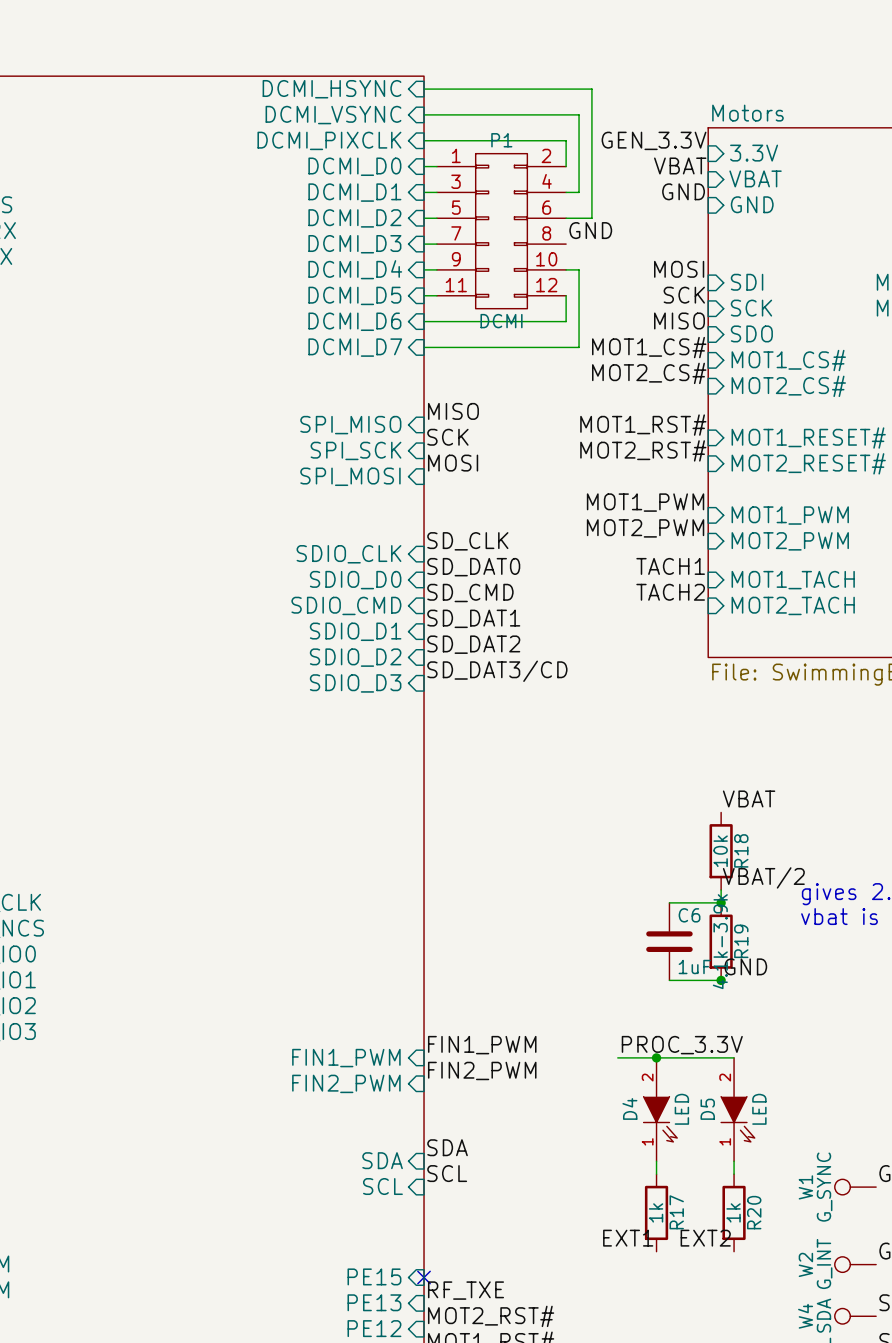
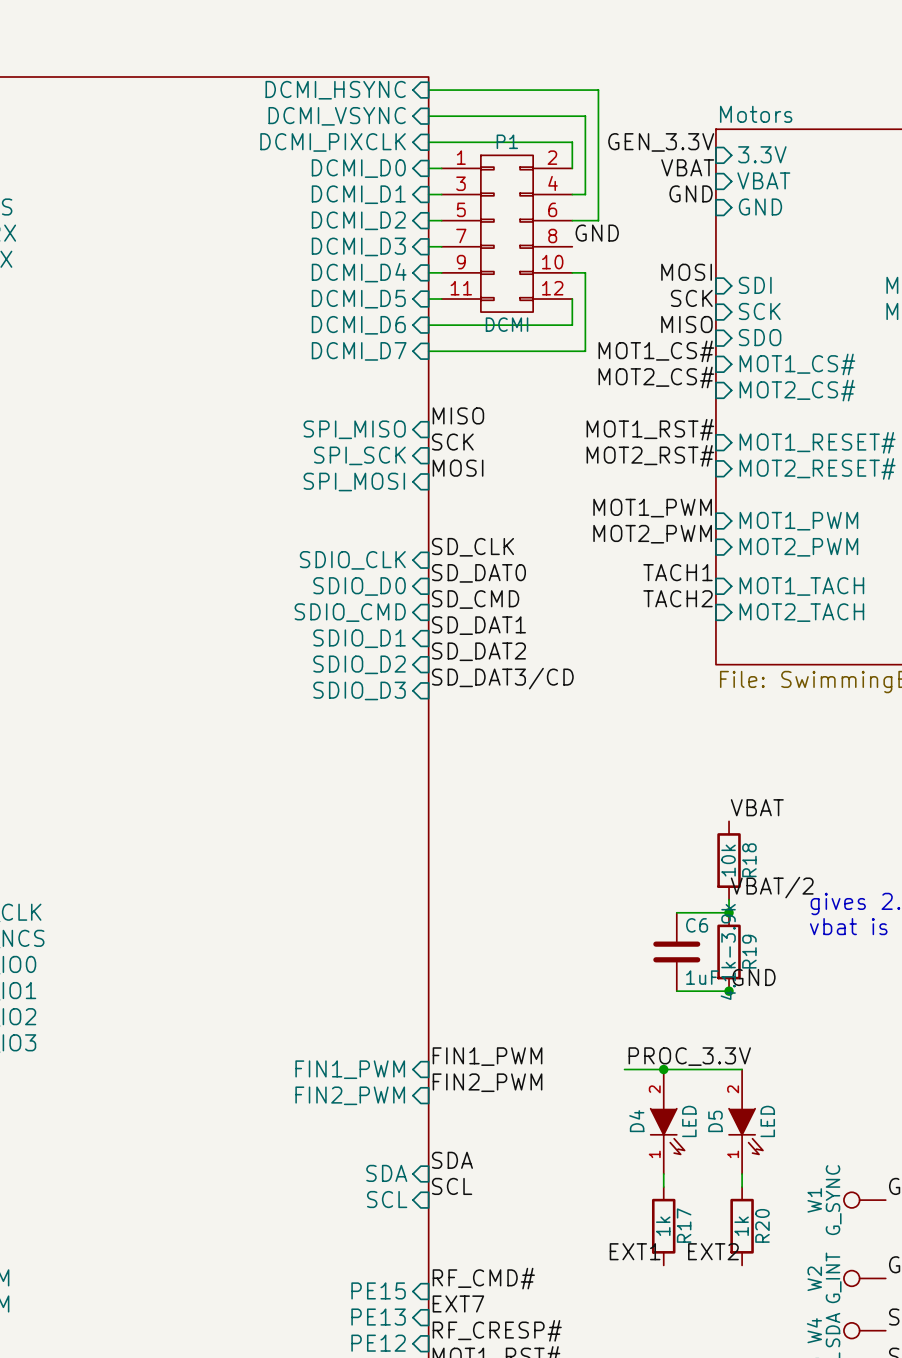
label: none -> RF_CMD# (483, 1278)
no-connect mark: (424, 1277) -> none
label: RF_TXE (466, 1290) -> EXT7 (458, 1303)
label: MOT2_RST# (491, 1316) -> RF_CRESP# (497, 1330)

